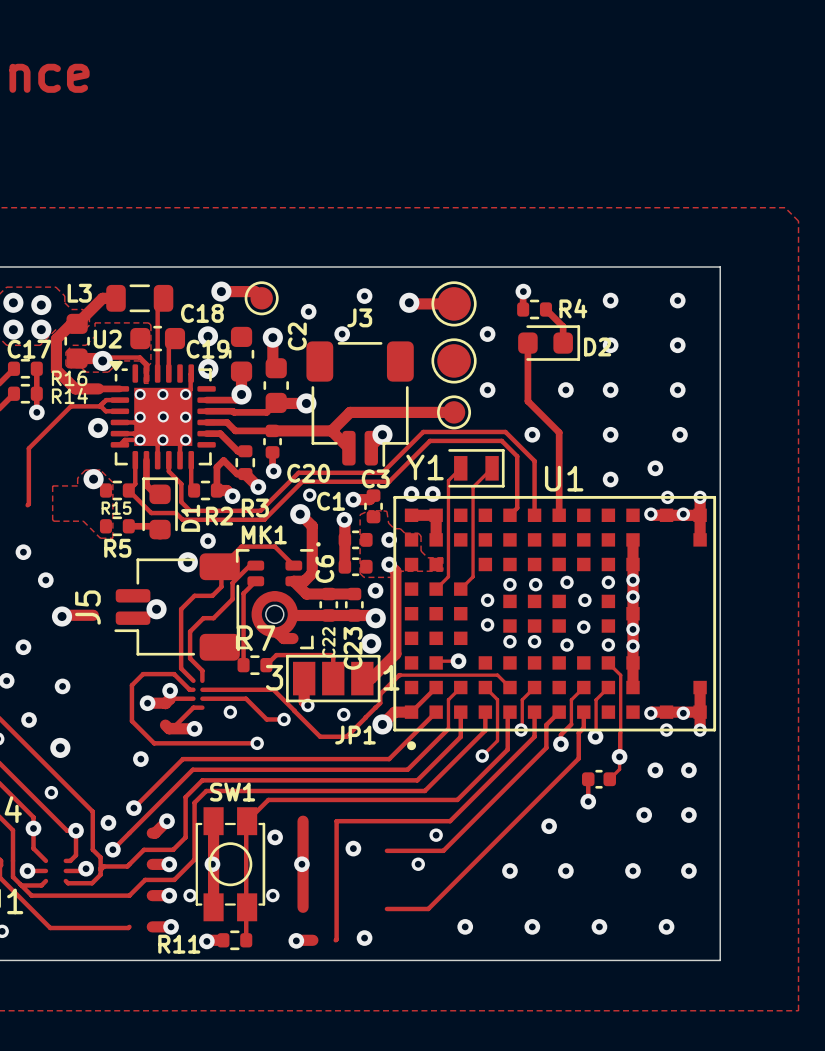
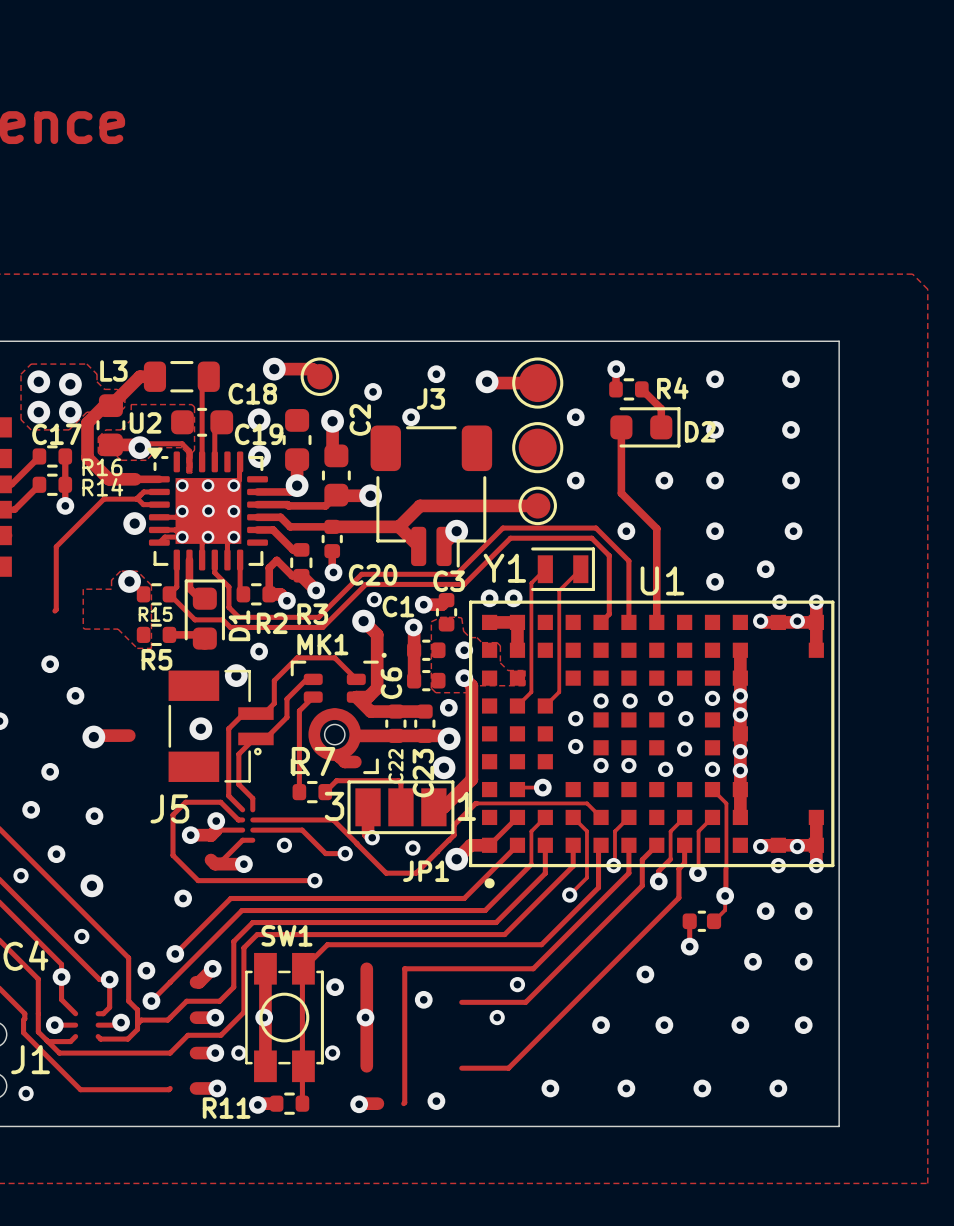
J5 footprint: [114, 553, 240, 661] -> [168, 669, 274, 783]
J5 name position: J5 (87, 607) -> J5 (169, 808)

